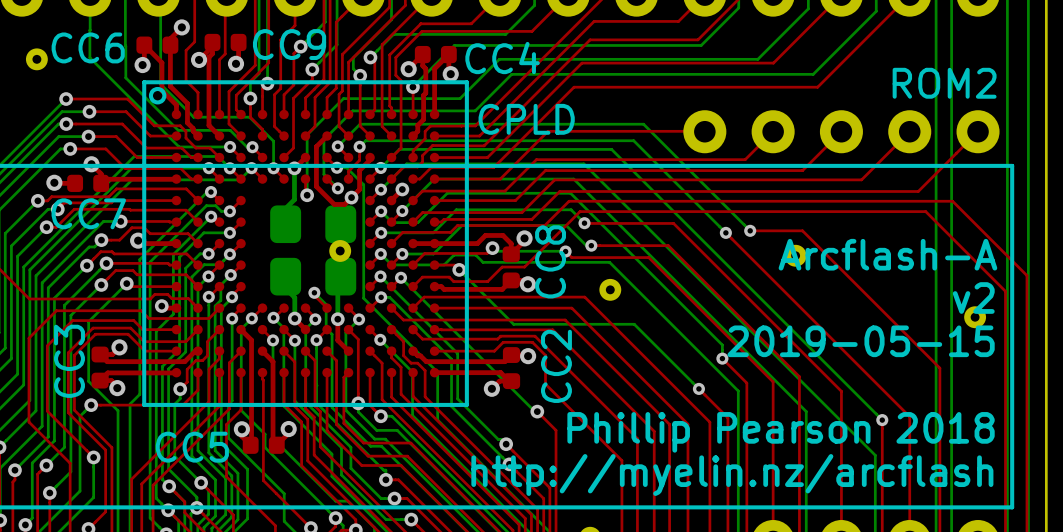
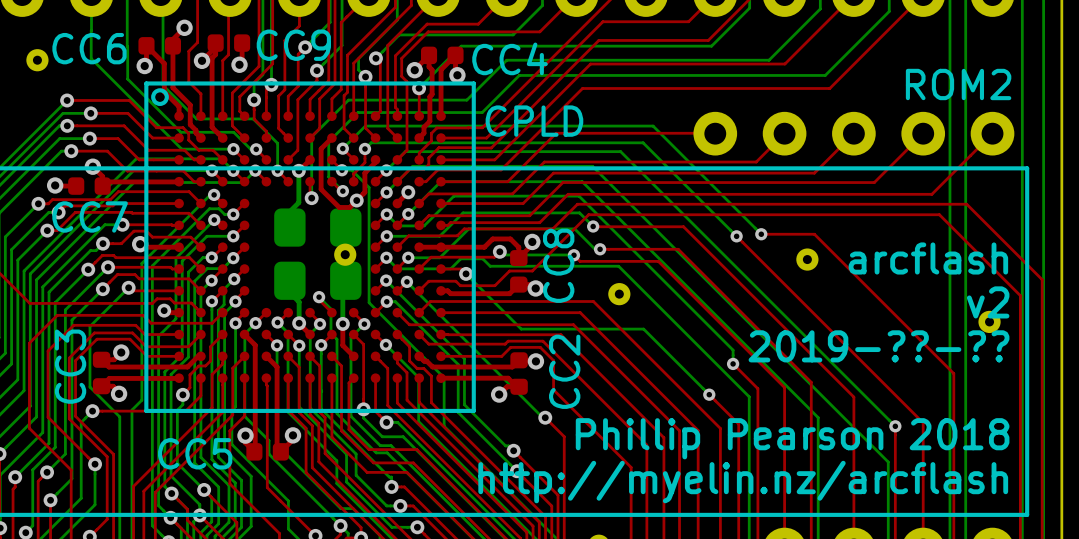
text: Arcflash-A (887, 254) -> arcflash (928, 258)
text: 2019-05-15 (861, 341) -> 2019-??-?? (879, 346)

